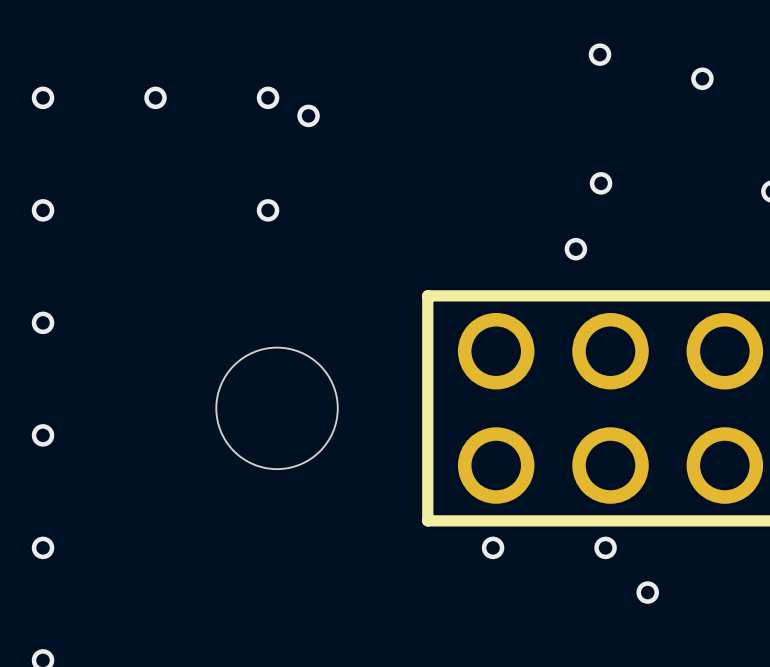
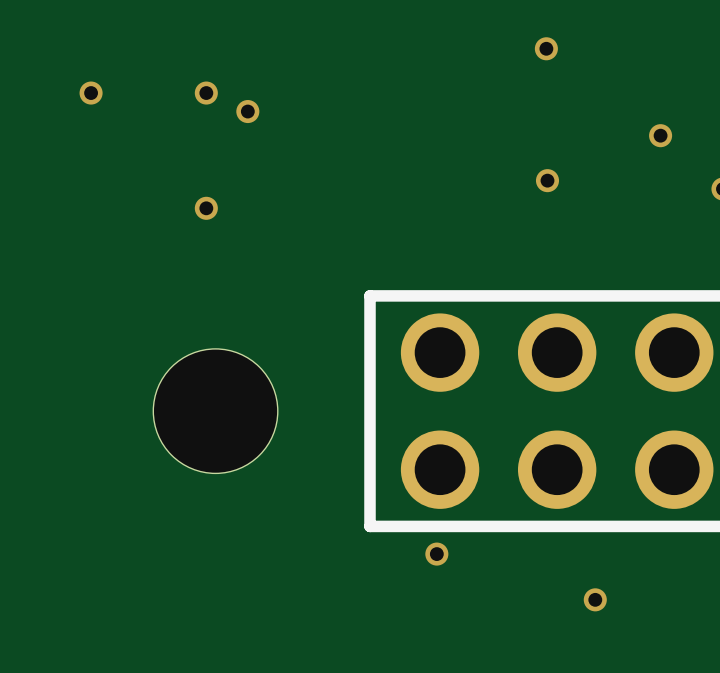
via position: (702, 78) -> (660, 135)
via: (575, 249) -> none
via: (605, 547) -> none

